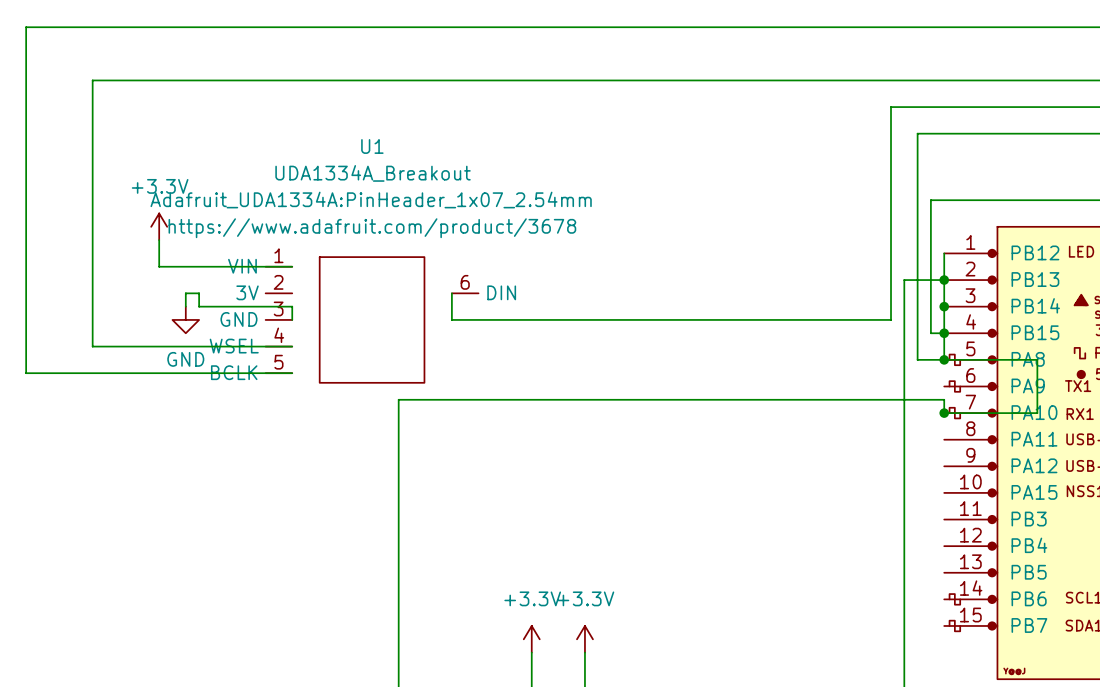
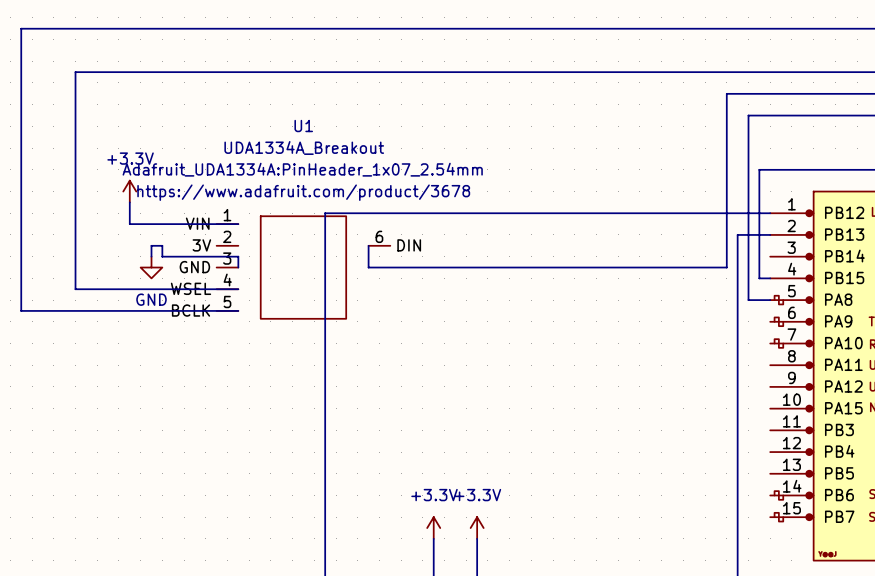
wire: (944, 253) (944, 359) (1037, 359) (1037, 413) (944, 413) (944, 399) (398, 399) -> (770, 213) (325, 213) (325, 332)
junction: (944, 280) -> none
junction: (944, 306) -> none
junction: (944, 333) -> none
junction: (944, 359) -> none
junction: (944, 413) -> none

